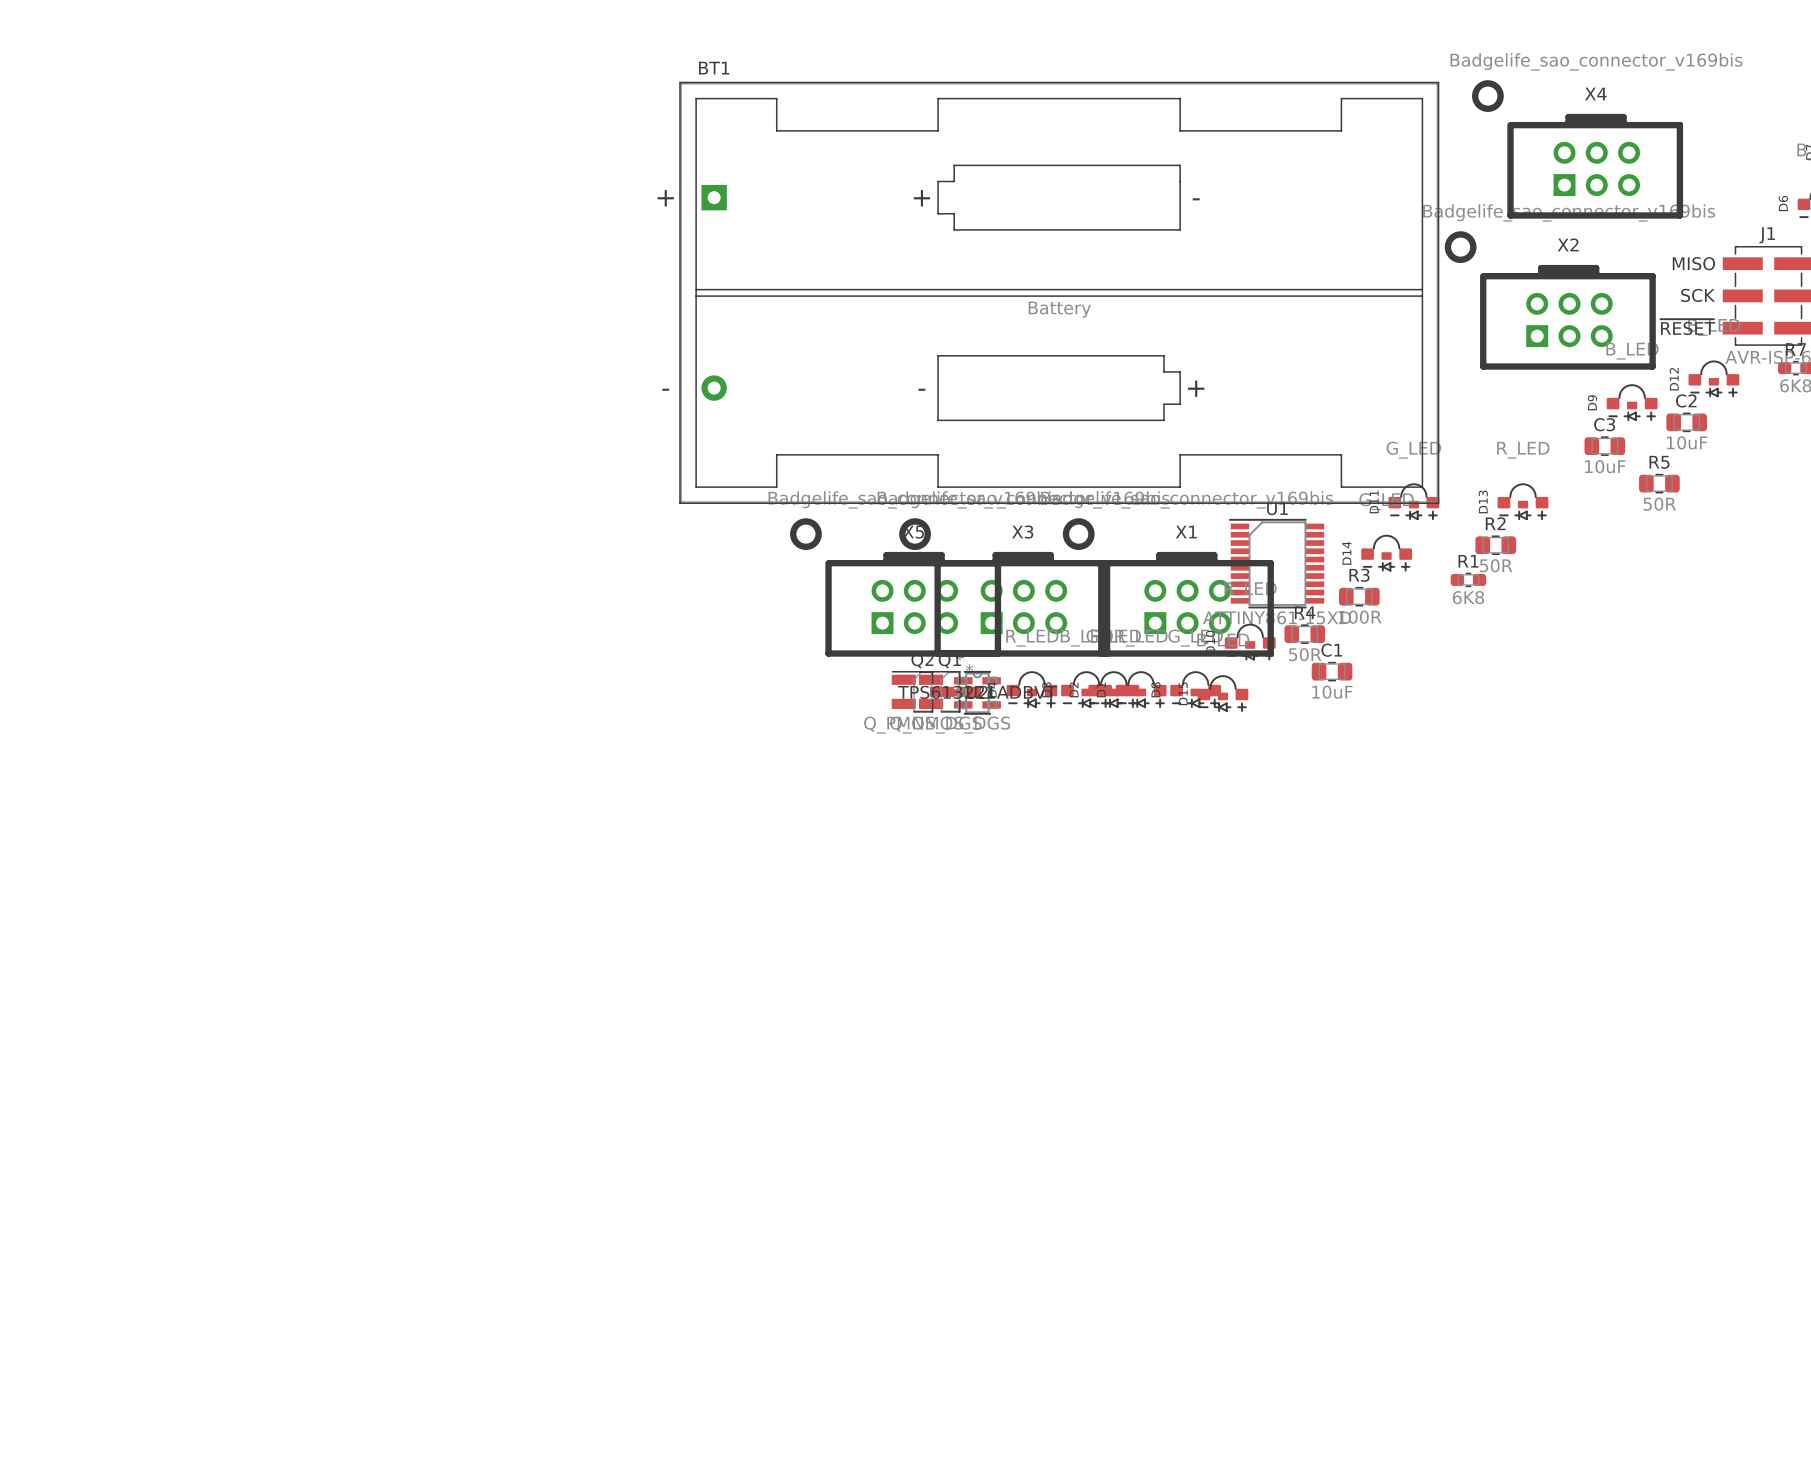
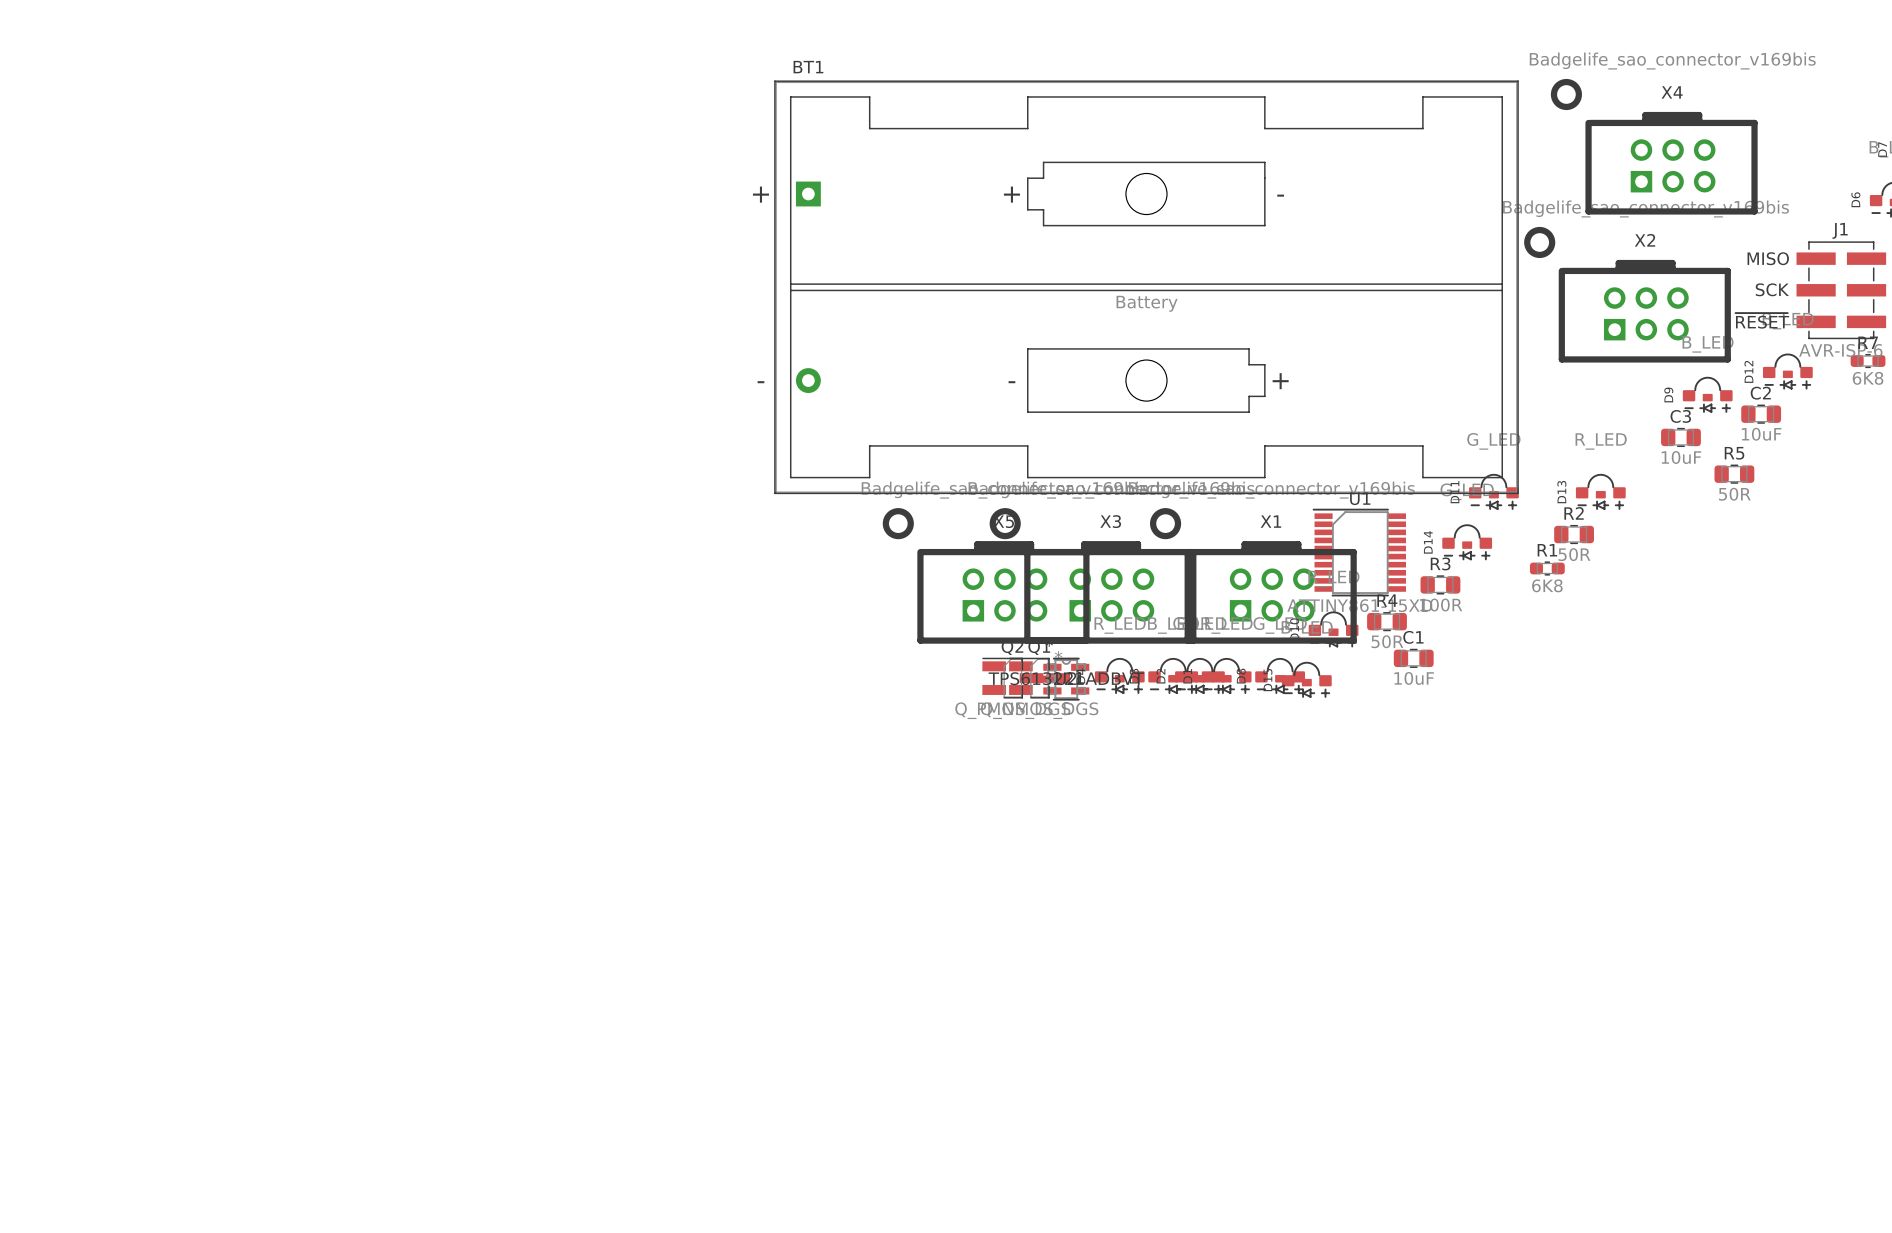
BT1 footprint: [679, 81, 1440, 505] -> [774, 80, 1519, 495]

